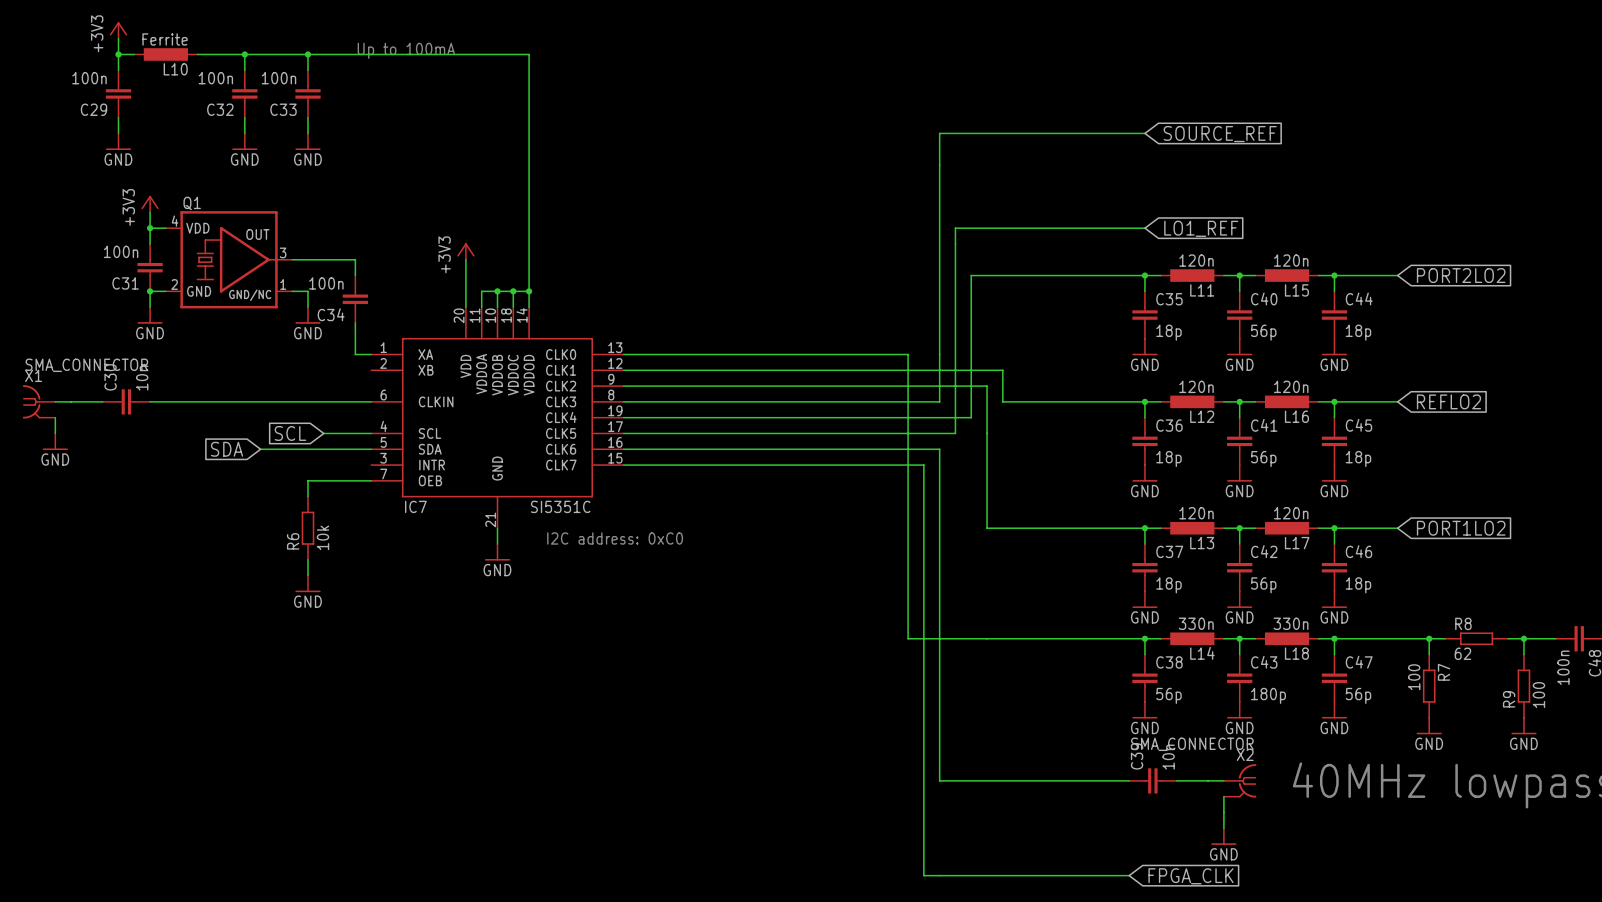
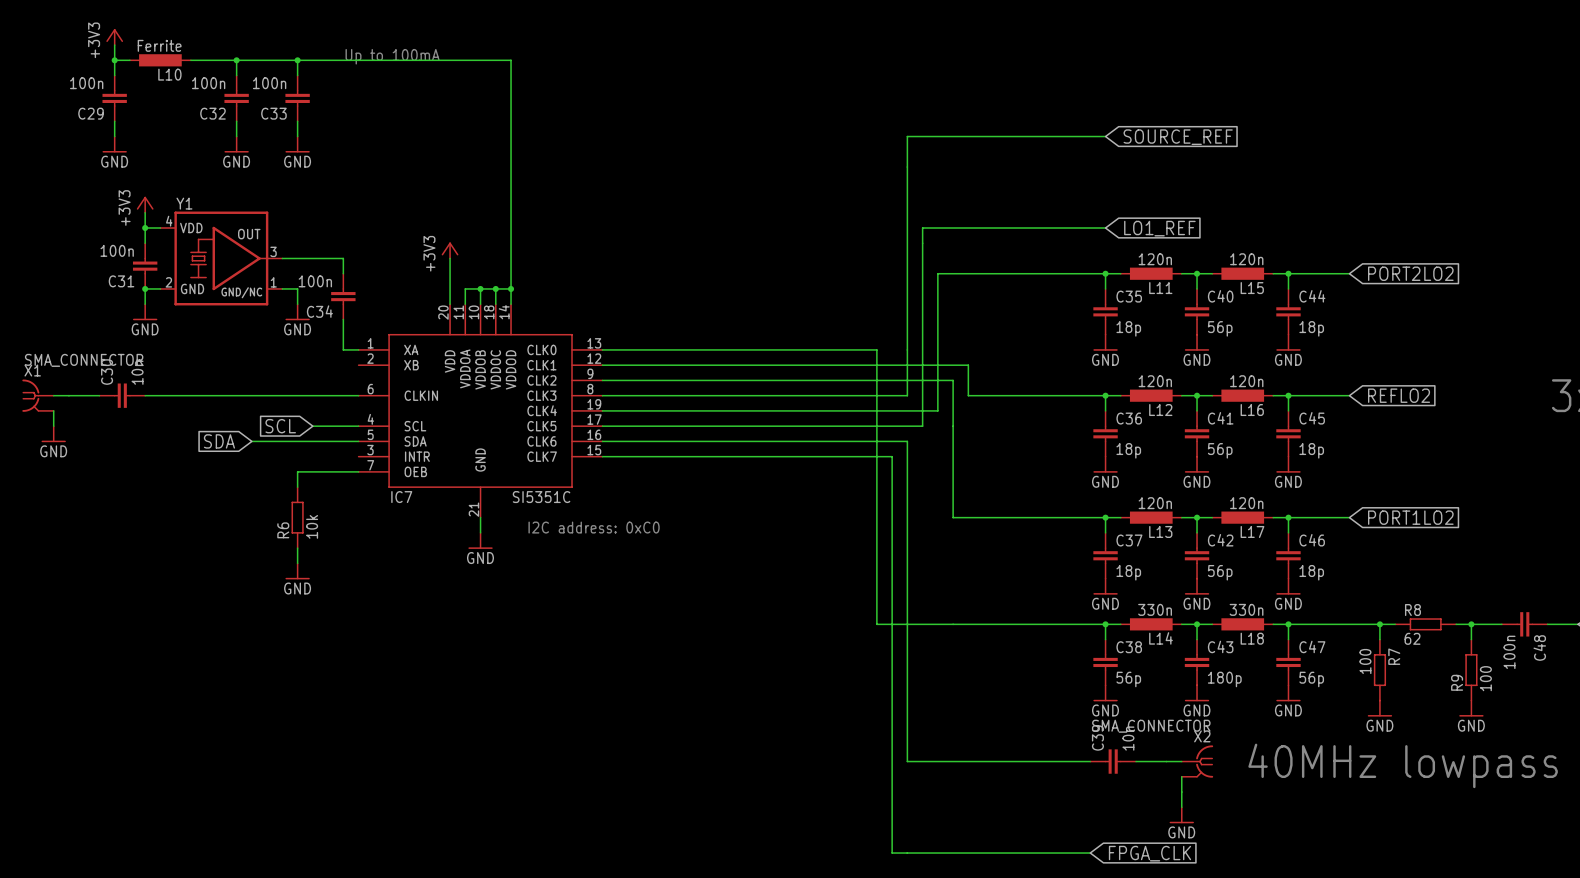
Q1 name: Q1 (192, 203) -> Y1 (184, 203)

